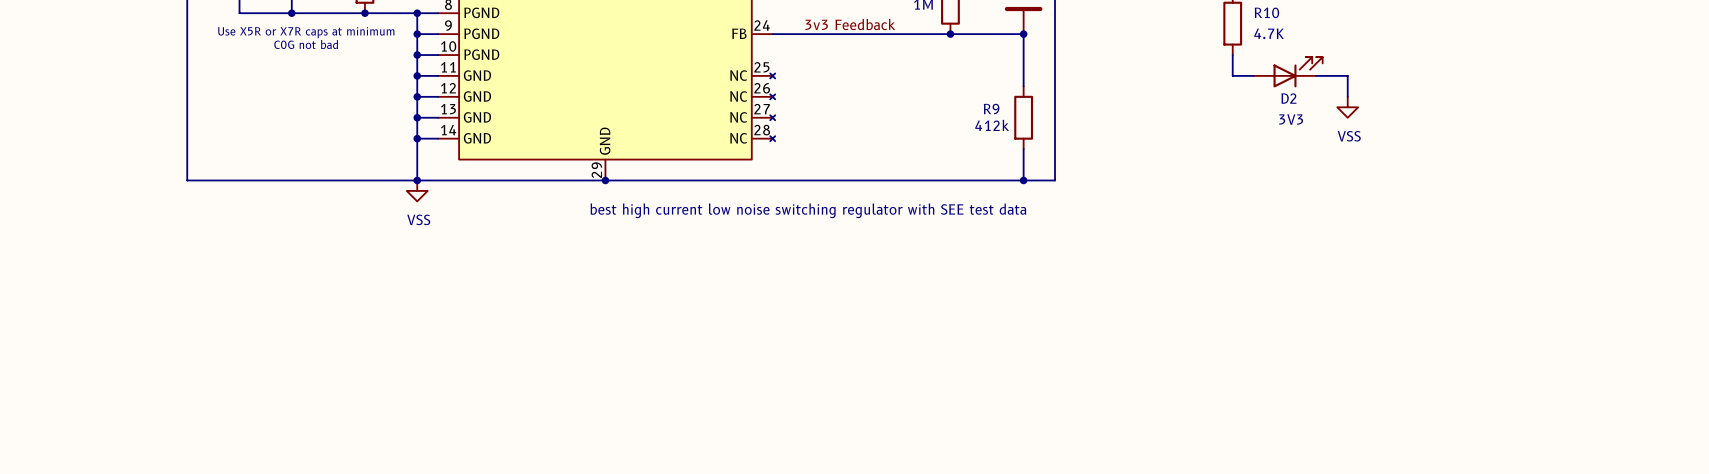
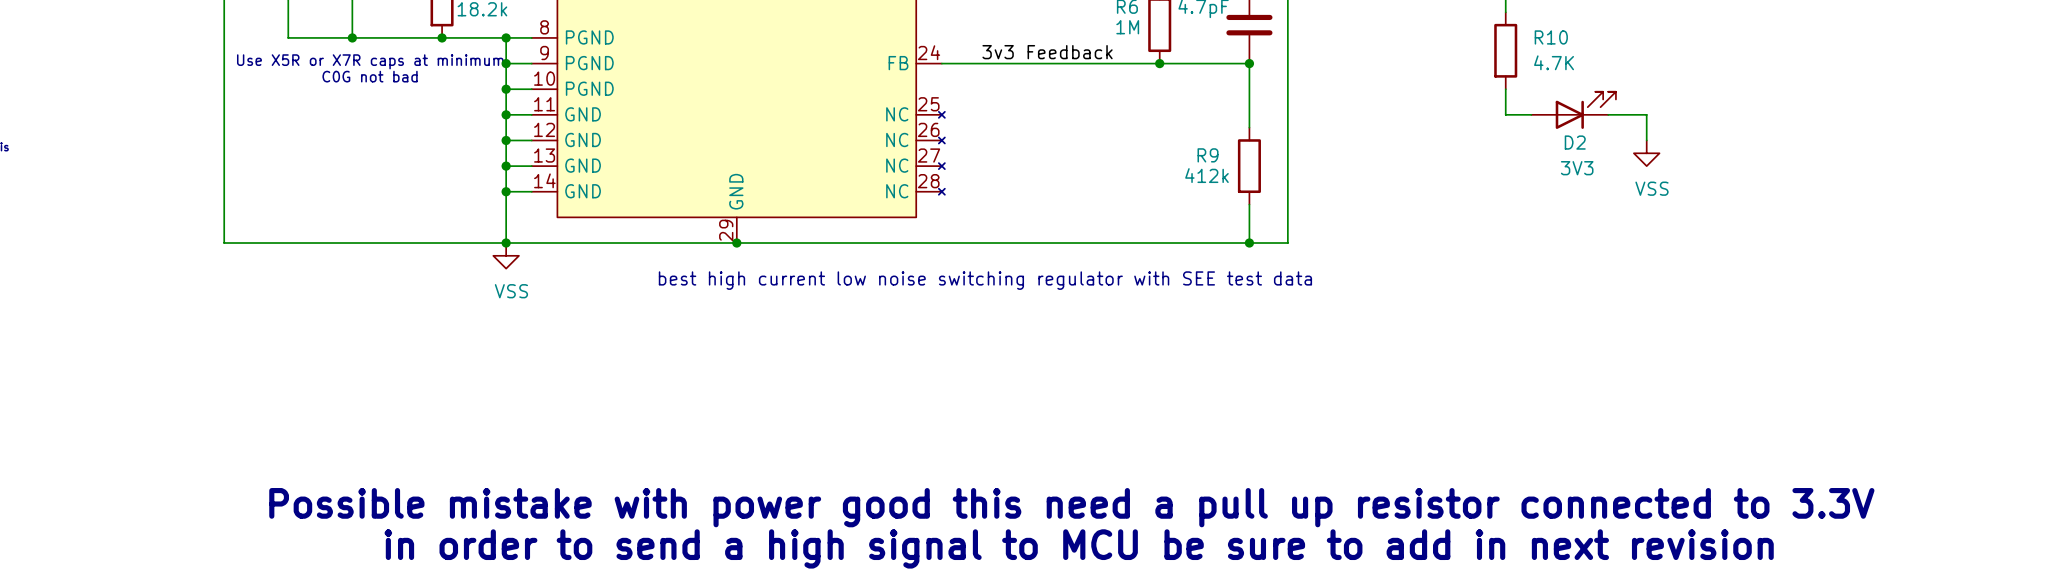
text: none -> Possible mistake with power good this need a pull up resistor connected to 3.3V (1071, 507)
text: none -> in order to send a high signal to MCU be sure to add in next revision (1079, 548)

